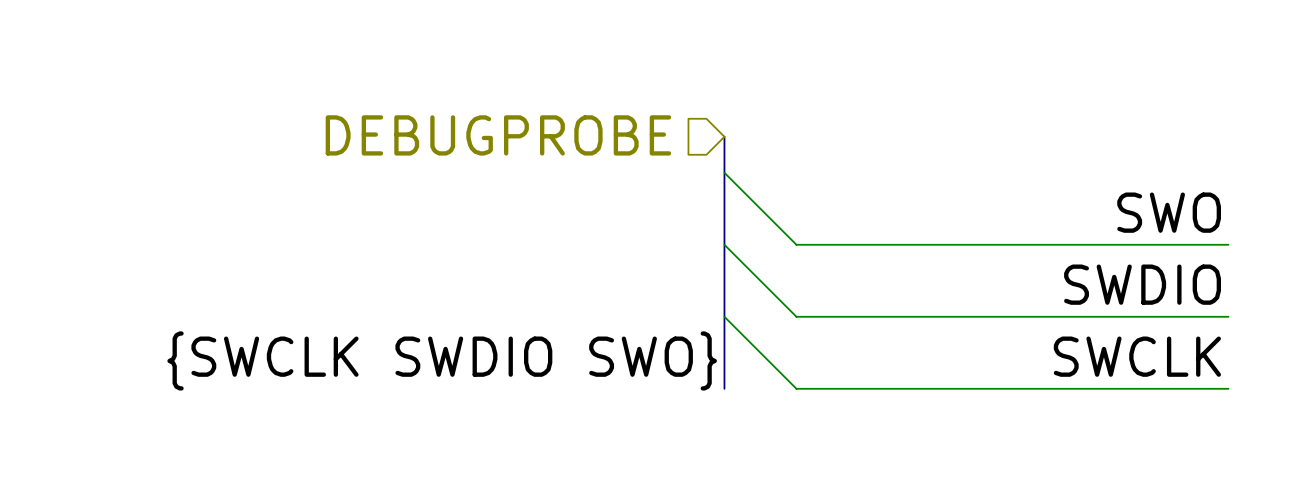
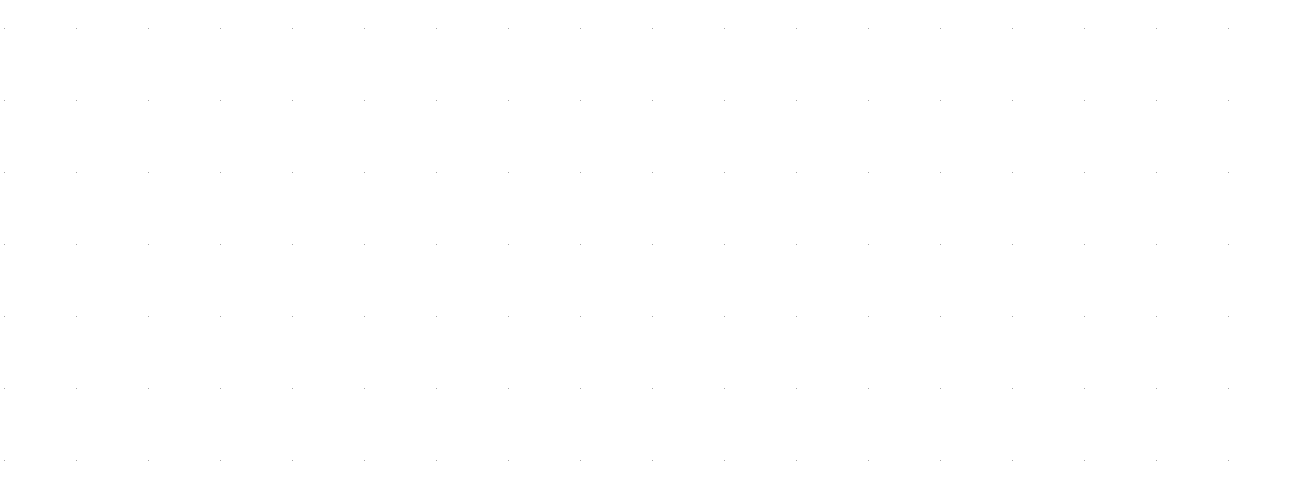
hierarchical label: DEBUGPROBE (498, 135) -> none
bus: (724, 136) (724, 388) -> none
wire: (724, 172) (796, 244) (1228, 244) -> none
label: SWO (1169, 212) -> none
wire: (724, 244) (796, 316) (1228, 316) -> none
label: SWDIO (1142, 284) -> none
wire: (724, 316) (796, 388) (1228, 388) -> none
label: SWCLK (1137, 356) -> none
label: {SWCLK SWDIO SWO} (442, 360) -> none

